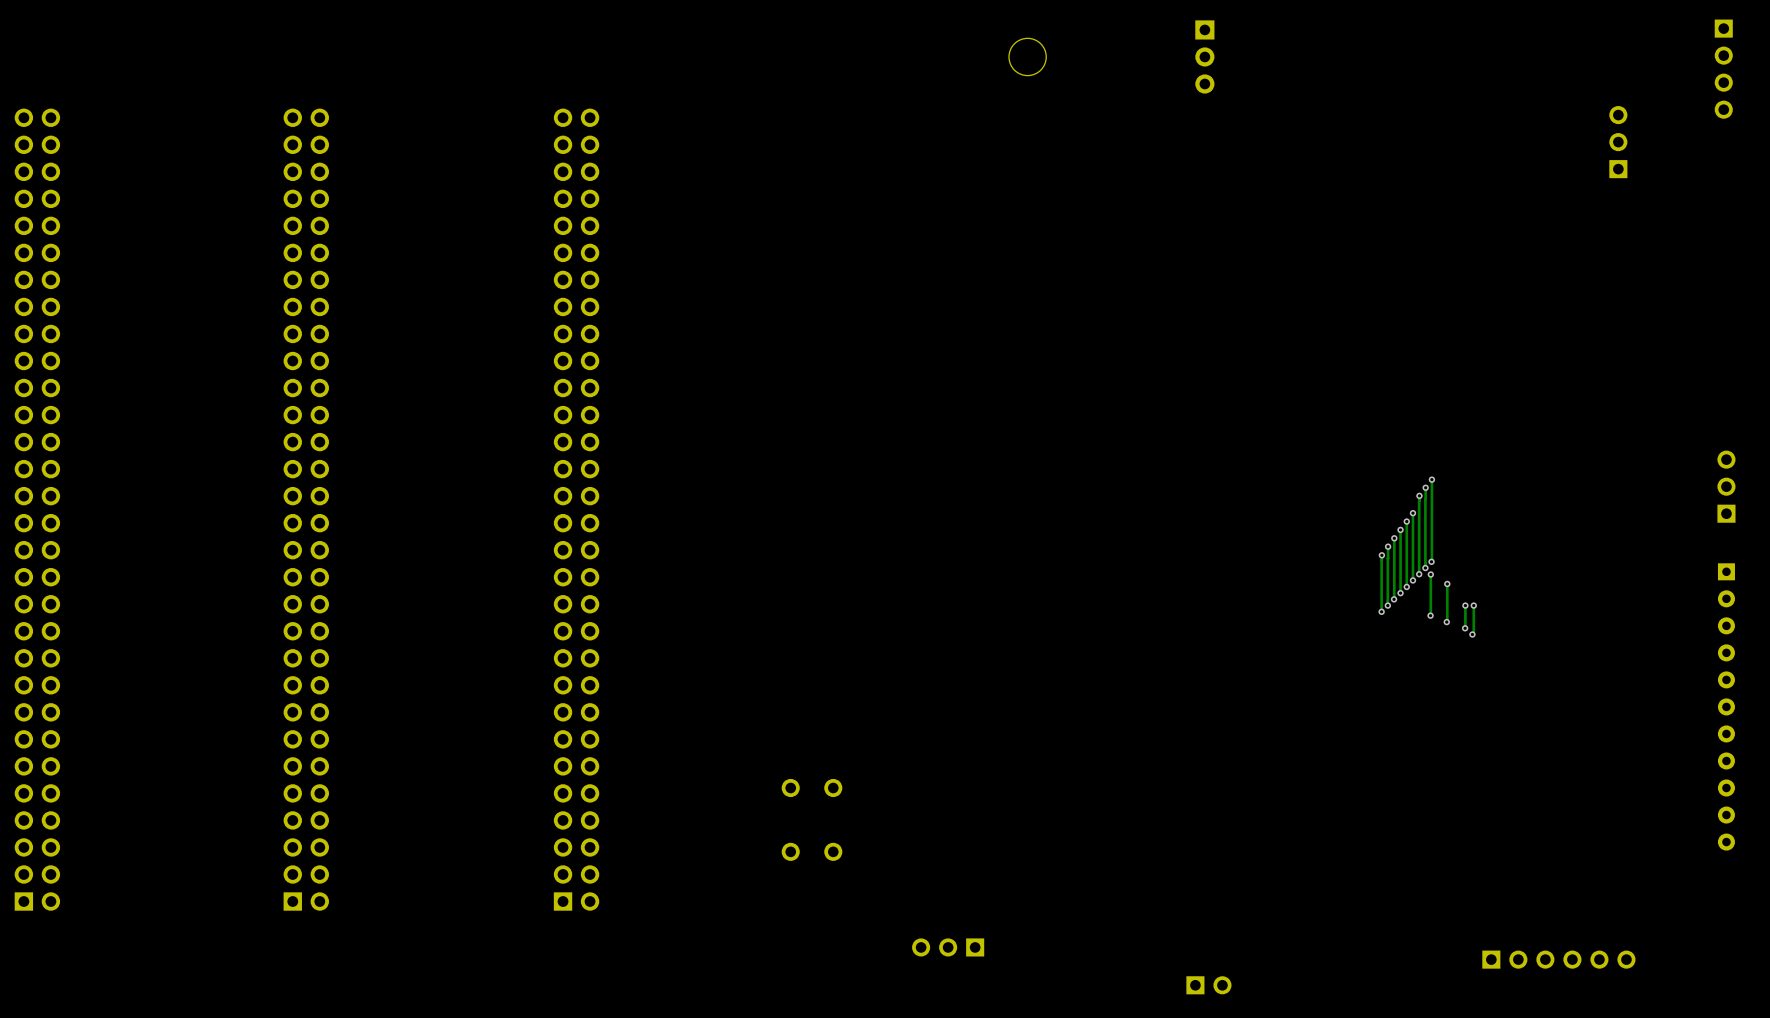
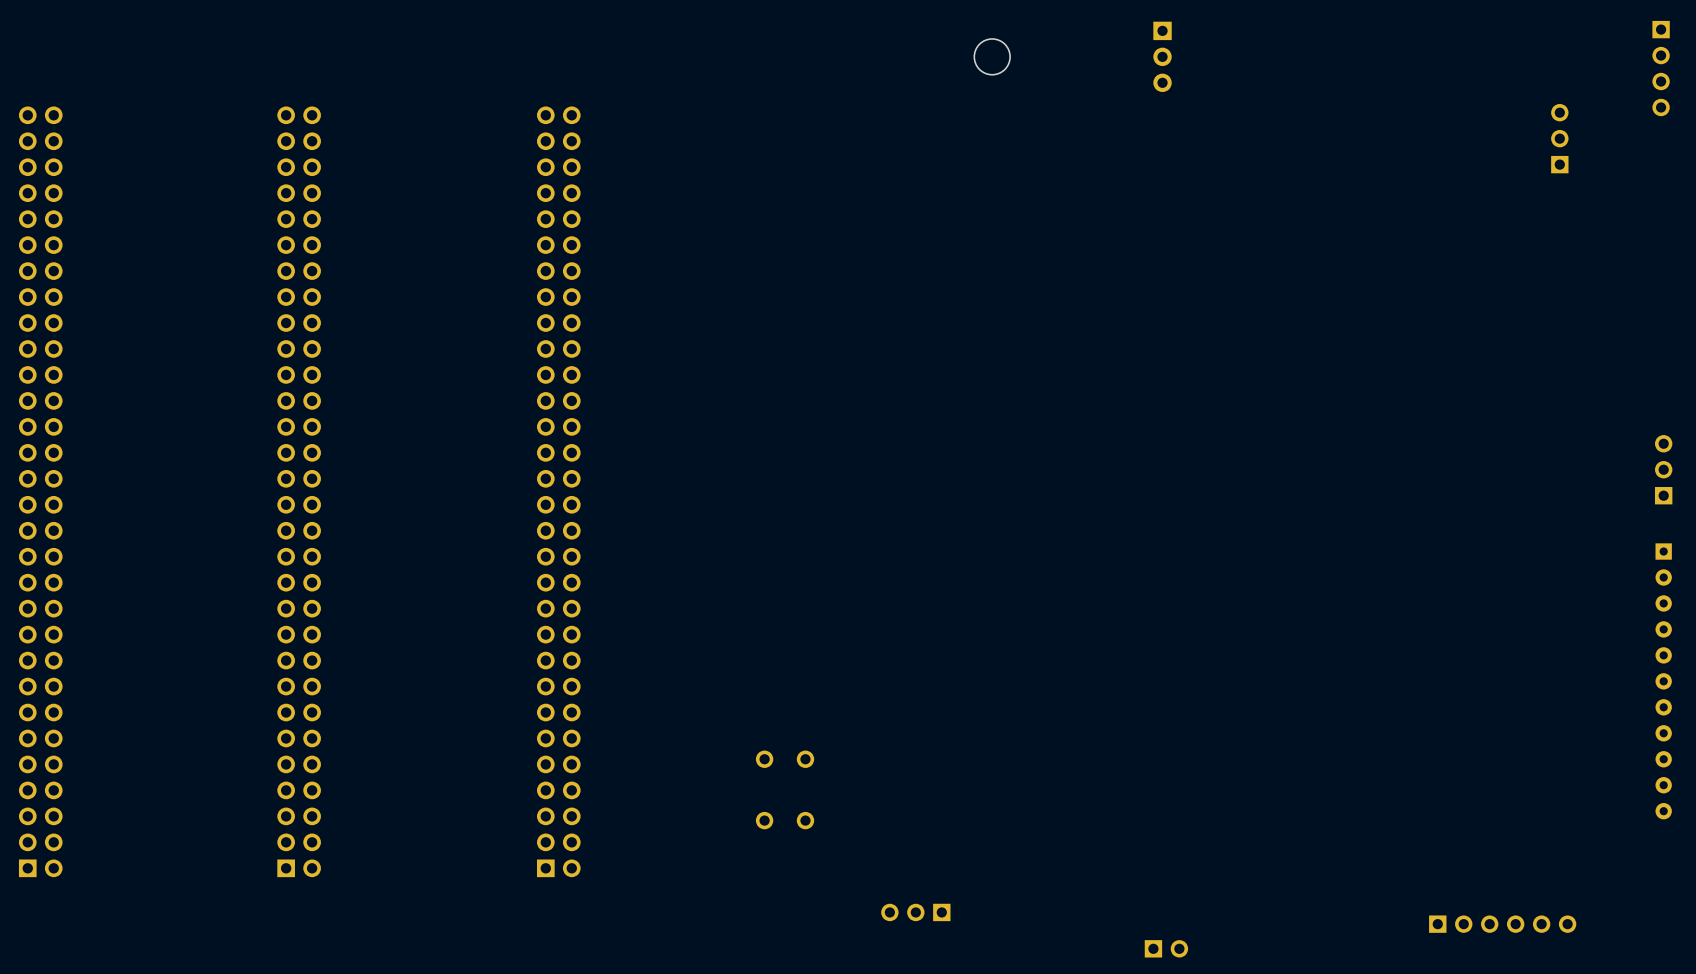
track: (1431, 479) (1431, 561) -> none
via: (1431, 479) -> none
track: (1425, 487) (1425, 568) -> none
via: (1425, 487) -> none
track: (1419, 495) (1419, 574) -> none
via: (1419, 495) -> none
track: (1412, 513) (1412, 580) -> none
via: (1412, 513) -> none
track: (1406, 521) (1406, 586) -> none
via: (1406, 521) -> none
track: (1400, 529) (1400, 593) -> none
via: (1400, 529) -> none
track: (1394, 538) (1394, 599) -> none
via: (1394, 538) -> none
track: (1388, 546) (1387, 605) -> none
via: (1388, 546) -> none
track: (1381, 555) (1381, 611) -> none
via: (1381, 555) -> none
via: (1431, 561) -> none
via: (1425, 568) -> none
via: (1419, 574) -> none
track: (1430, 574) (1430, 615) -> none
via: (1430, 574) -> none
via: (1412, 580) -> none
track: (1447, 583) (1446, 622) -> none
via: (1447, 583) -> none
via: (1406, 586) -> none
via: (1400, 593) -> none
via: (1394, 599) -> none
via: (1387, 605) -> none
track: (1465, 605) (1465, 628) -> none
via: (1465, 605) -> none
track: (1473, 605) (1472, 634) -> none
via: (1473, 605) -> none
via: (1381, 611) -> none
via: (1430, 615) -> none
via: (1446, 622) -> none
via: (1465, 628) -> none
via: (1472, 634) -> none

